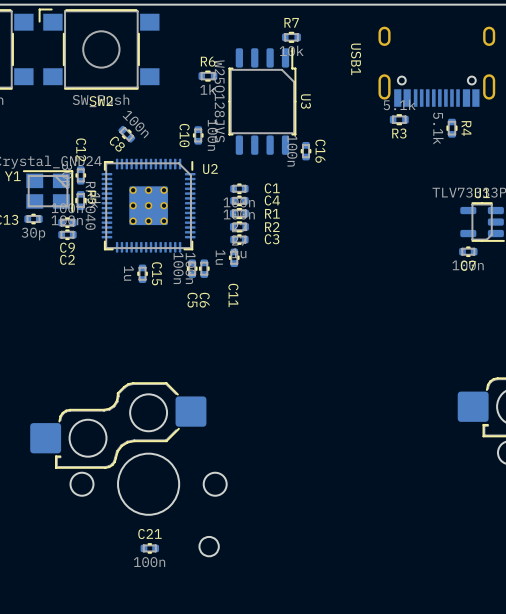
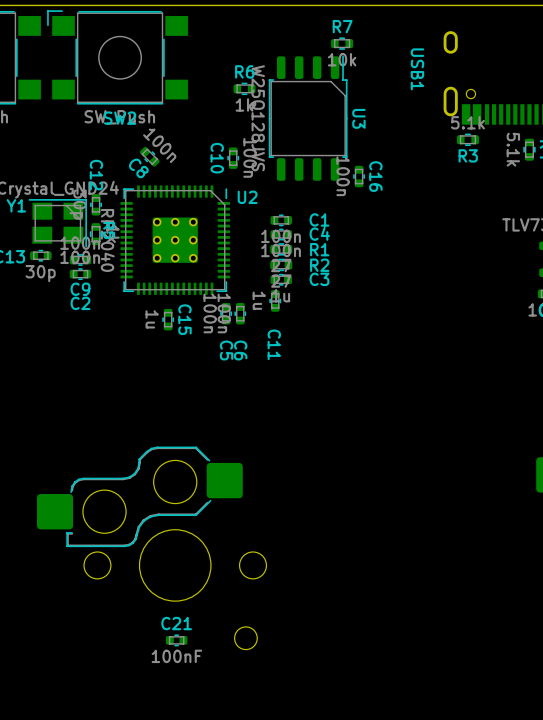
C21 value: 100n (149, 562) -> 100nF (176, 656)

